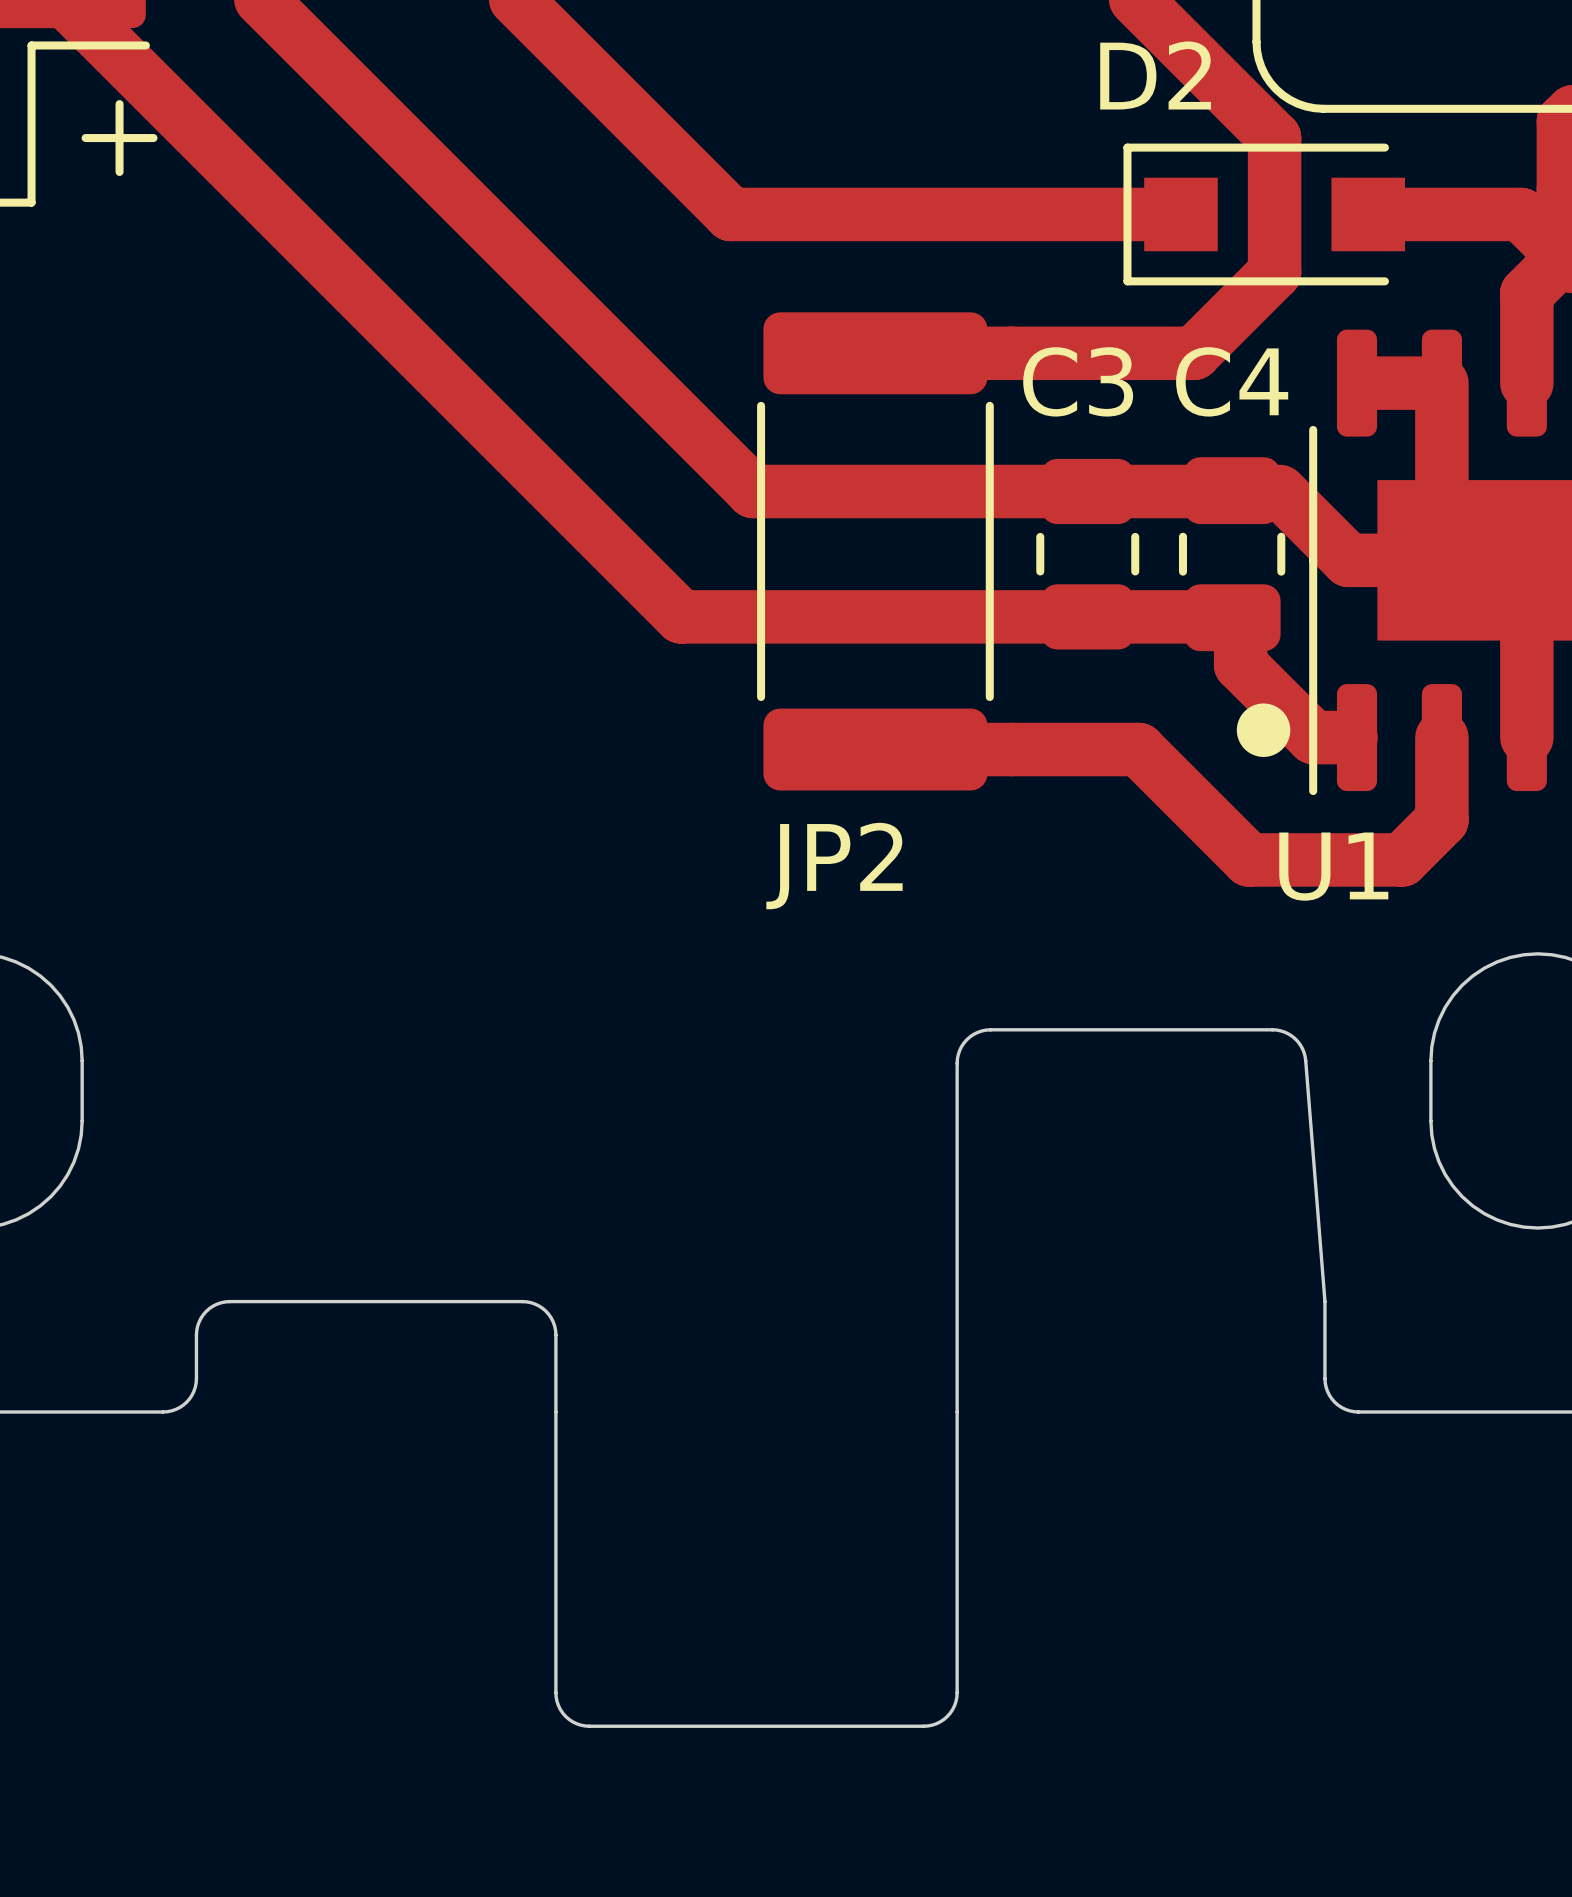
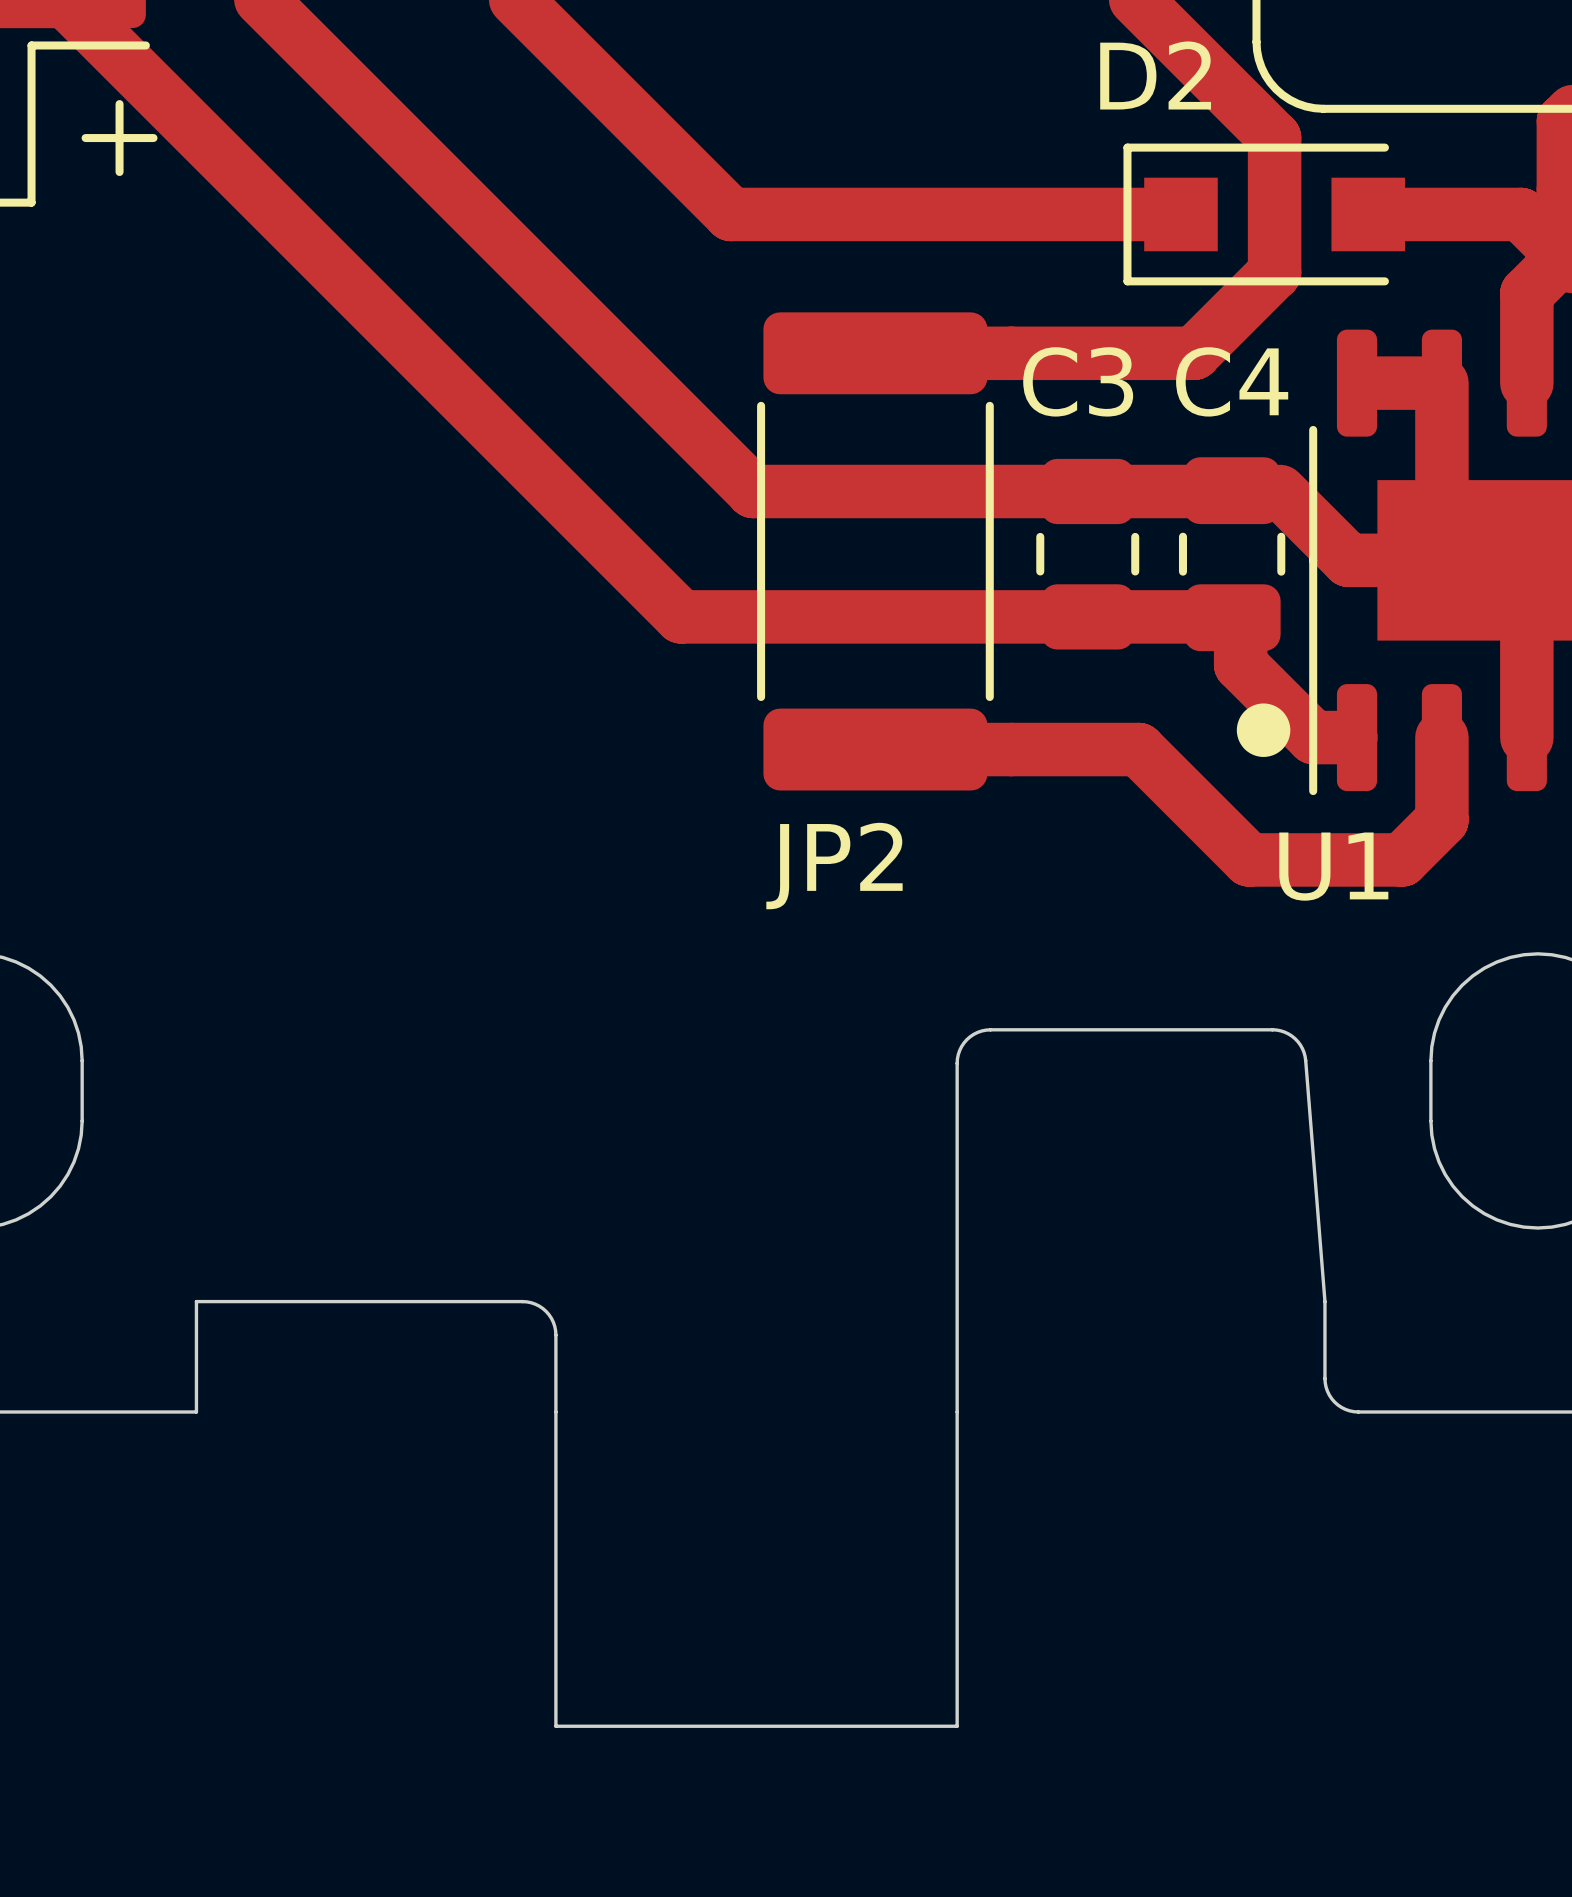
board edge: (229, 1301) (217, 1304) (206, 1311) (199, 1322) (196, 1335) -> (229, 1301) (196, 1301) (196, 1335)
board edge: (196, 1378) (193, 1391) (186, 1402) (175, 1409) (163, 1412) -> (196, 1378) (196, 1412) (163, 1412)
board edge: (555, 1692) (558, 1705) (565, 1716) (576, 1723) (589, 1726) -> (555, 1692) (555, 1726) (589, 1726)
board edge: (957, 1692) (954, 1705) (947, 1716) (936, 1723) (923, 1726) -> (957, 1692) (957, 1726) (923, 1726)

